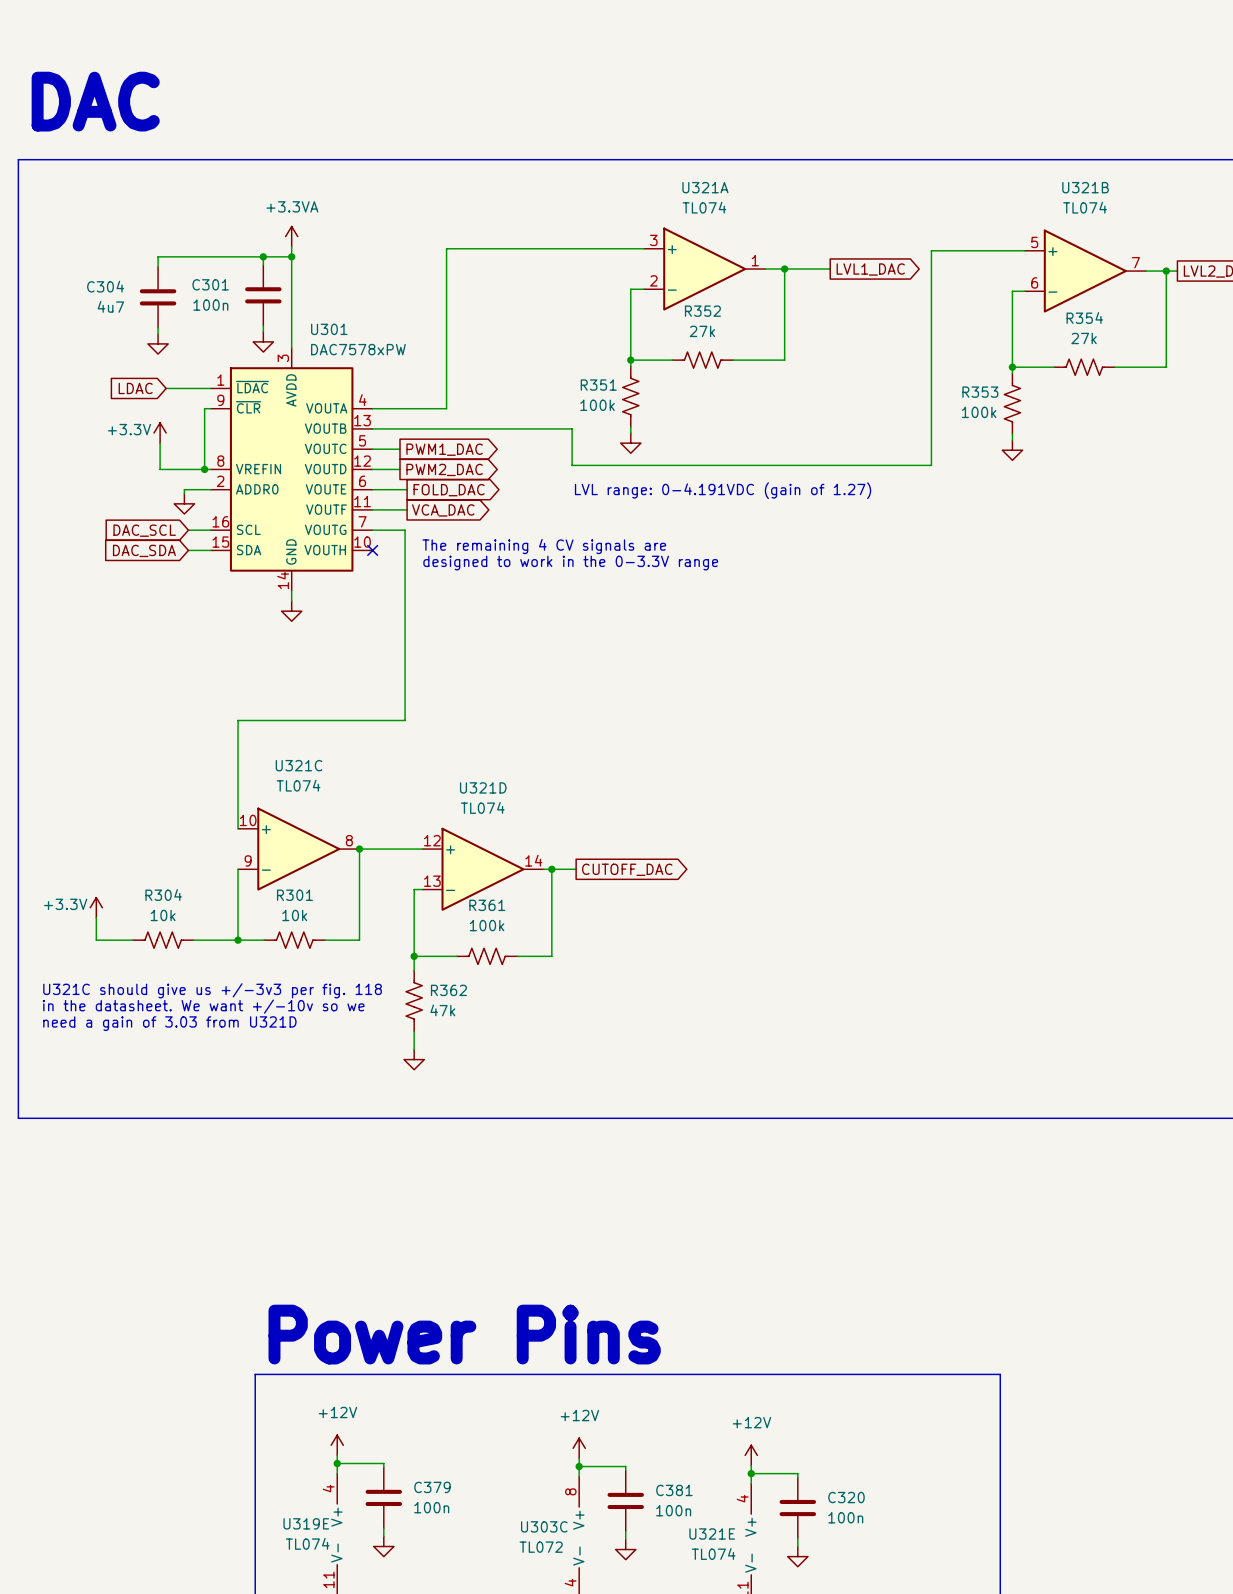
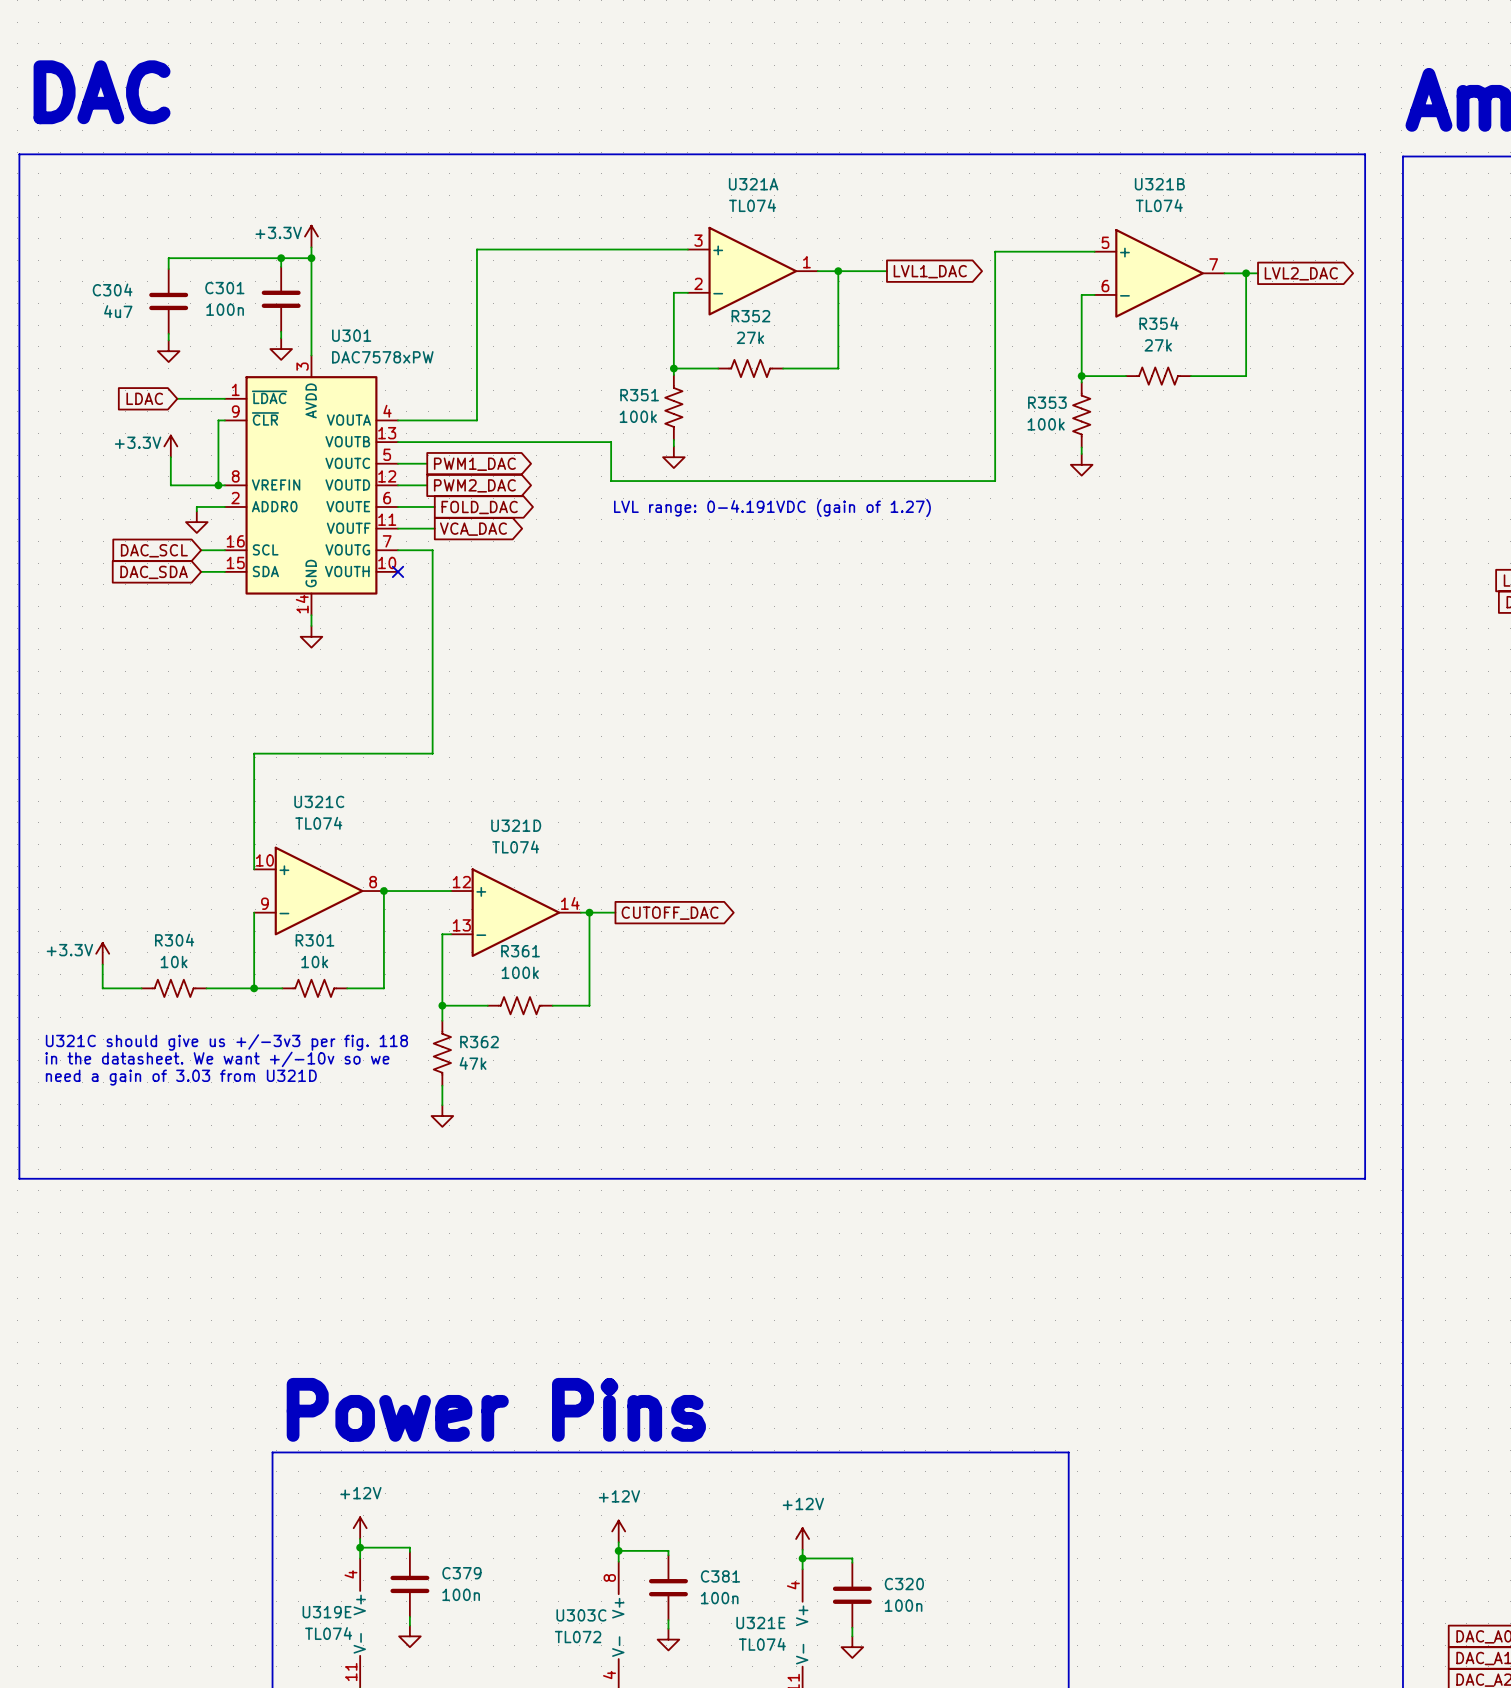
power symbol: +3.3VA (291, 236) -> +3.3V (311, 236)
text: The remaining 4 CV signals are (544, 546) -> none
text: designed to work in the 0-3.3V range (570, 563) -> none

